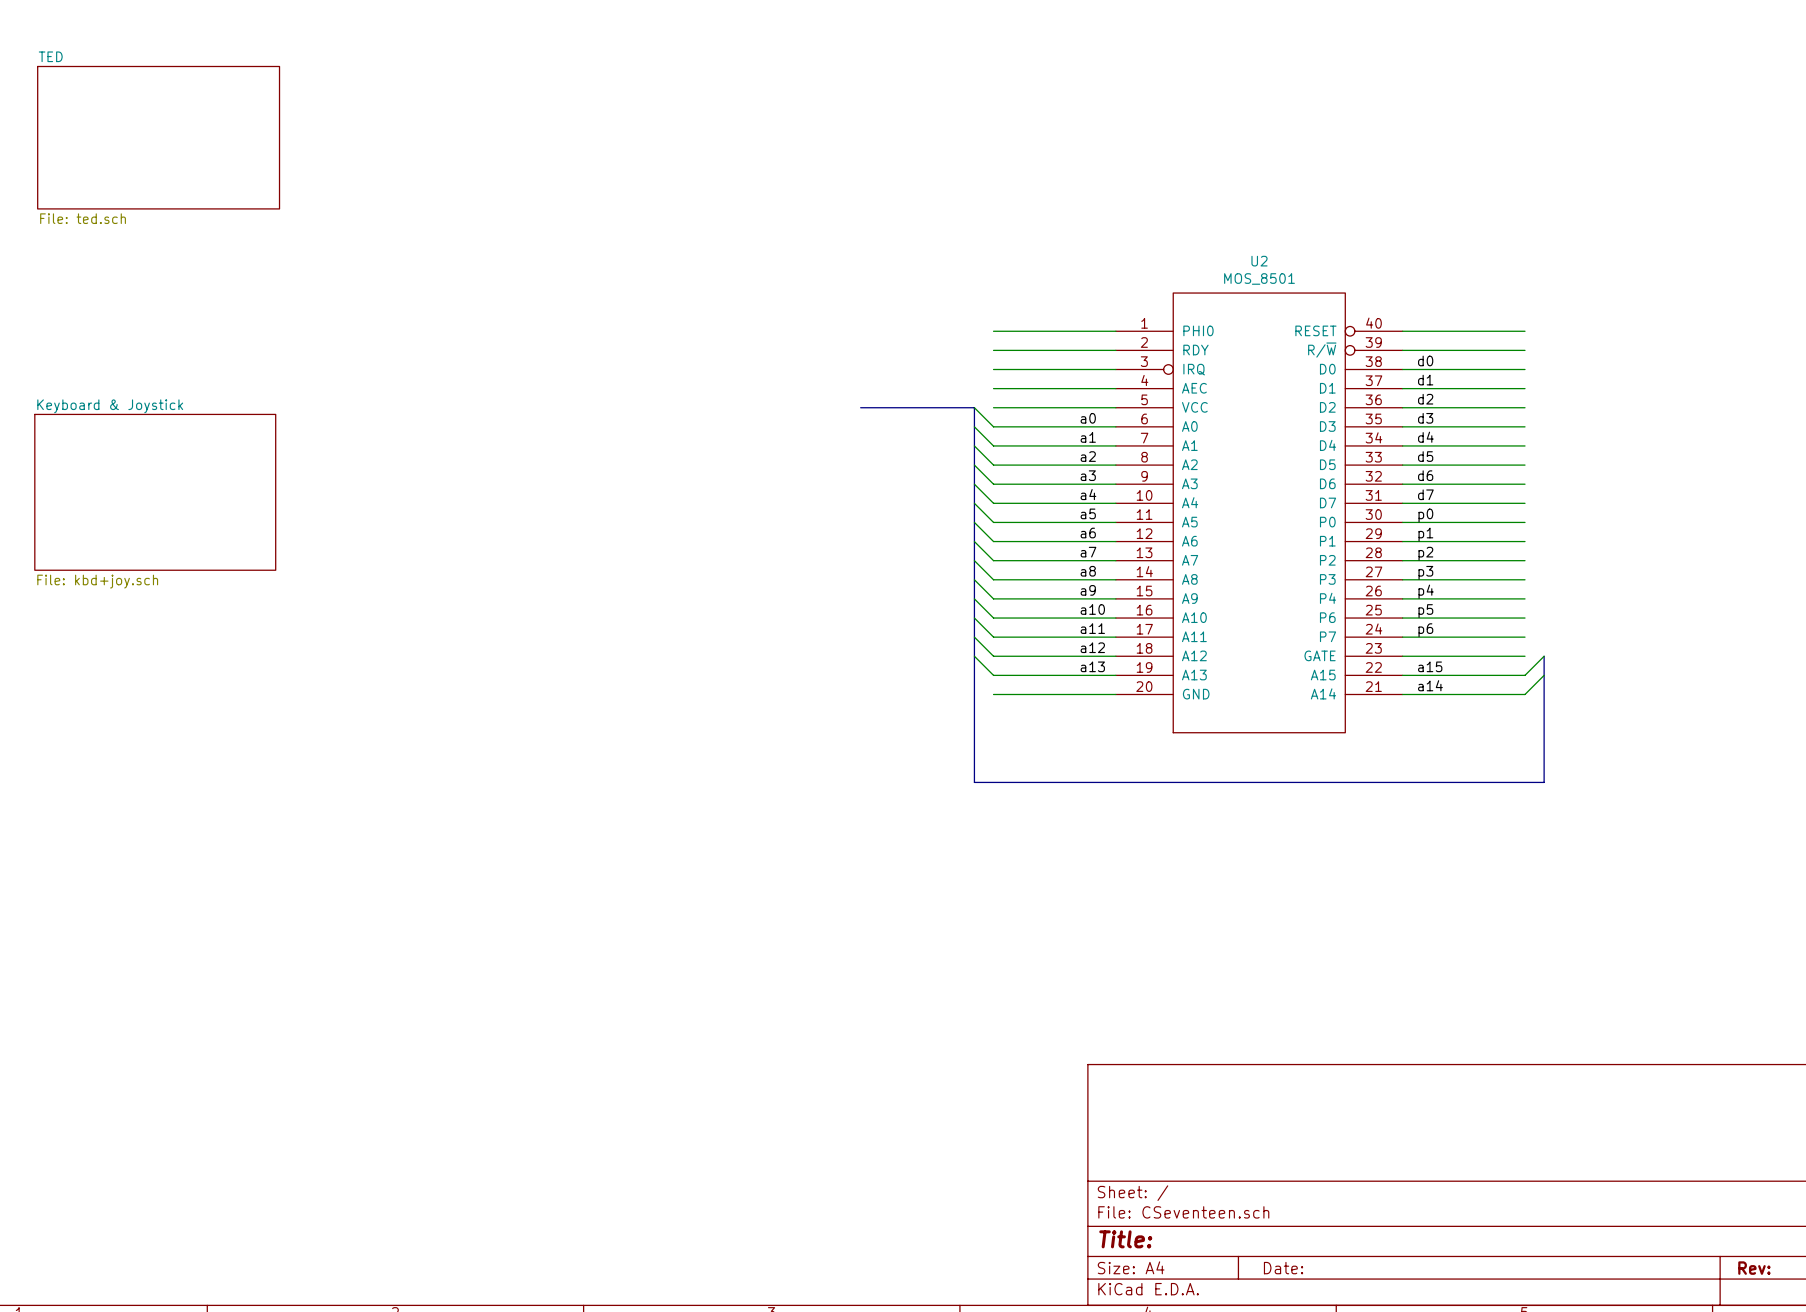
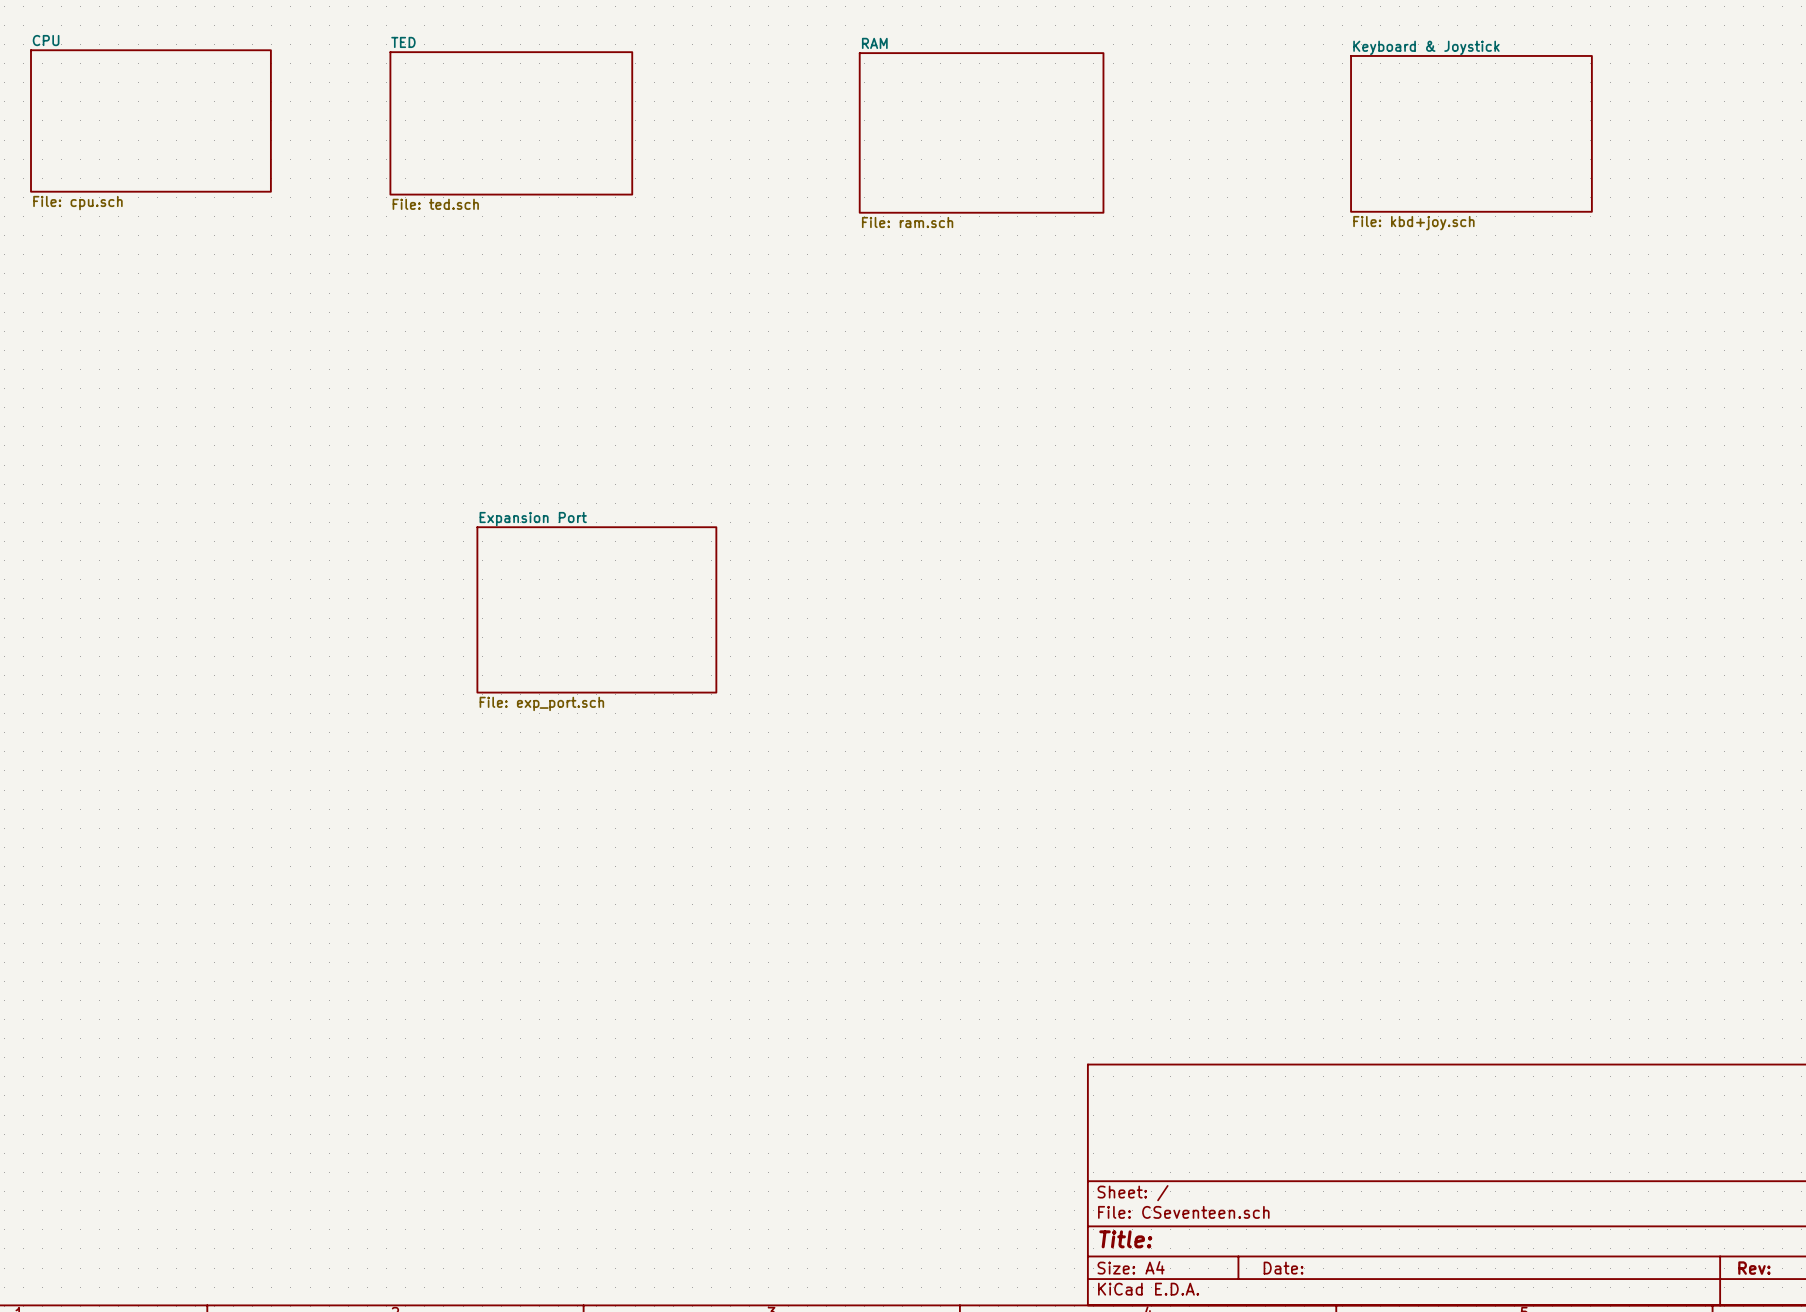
sheet CPU: none -> File: cpu.sch (150, 120)
sheet TED: none -> File: ted.sch (511, 123)
sheet RAM: none -> File: ram.sch (981, 132)
sheet Keyboard & Joystick: none -> File: kbd+joy.sch (1471, 133)
sheet TED: File: ted.sch (158, 137) -> none
wire: (993, 331) (1115, 331) -> none
wire: (1402, 331) (1524, 331) -> none
wire: (993, 350) (1115, 350) -> none
wire: (1402, 350) (1524, 350) -> none
label: d0 (1425, 360) -> none
wire: (993, 369) (1115, 369) -> none
wire: (1402, 369) (1524, 369) -> none
label: d1 (1425, 380) -> none
wire: (993, 388) (1115, 388) -> none
wire: (1402, 388) (1524, 388) -> none
label: d2 (1425, 399) -> none
bus: (860, 407) (974, 407) (974, 782) (1544, 782) (1544, 656) -> none
wire: (974, 407) (993, 426) (1115, 426) -> none
wire: (993, 407) (1115, 407) -> none
wire: (1402, 407) (1524, 407) -> none
label: a0 (1088, 418) -> none
label: d3 (1425, 418) -> none
wire: (974, 426) (993, 445) (1115, 445) -> none
wire: (1402, 426) (1524, 426) -> none
label: a1 (1088, 437) -> none
label: d4 (1425, 437) -> none
wire: (974, 445) (993, 465) (1115, 465) -> none
wire: (1402, 445) (1524, 445) -> none
label: a2 (1088, 456) -> none
label: d5 (1425, 456) -> none
wire: (974, 465) (993, 484) (1115, 484) -> none
wire: (1402, 465) (1524, 465) -> none
label: a3 (1088, 475) -> none
label: d6 (1425, 475) -> none
wire: (974, 484) (993, 503) (1115, 503) -> none
wire: (1402, 484) (1524, 484) -> none
sheet Keyboard & Joystick: File: kbd+joy.sch (155, 492) -> none
label: a4 (1088, 494) -> none
label: d7 (1425, 494) -> none
wire: (974, 503) (993, 522) (1115, 522) -> none
wire: (1402, 503) (1524, 503) -> none
U2: MOS_8501 (1259, 512) -> none
label: a5 (1088, 513) -> none
label: p0 (1425, 515) -> none
wire: (974, 522) (993, 541) (1115, 541) -> none
wire: (1402, 522) (1524, 522) -> none
label: a6 (1088, 533) -> none
label: p1 (1425, 534) -> none
wire: (974, 541) (993, 560) (1115, 560) -> none
wire: (1402, 541) (1524, 541) -> none
label: a7 (1088, 552) -> none
label: p2 (1425, 553) -> none
wire: (974, 560) (993, 579) (1115, 579) -> none
wire: (1402, 560) (1524, 560) -> none
label: a8 (1088, 571) -> none
label: p3 (1425, 572) -> none
wire: (974, 579) (993, 598) (1115, 598) -> none
wire: (1402, 579) (1524, 579) -> none
label: a9 (1088, 590) -> none
label: p4 (1426, 591) -> none
wire: (974, 598) (993, 618) (1115, 618) -> none
wire: (1402, 598) (1524, 598) -> none
sheet Expansion Port: none -> File: exp_port.sch (596, 609)
label: a10 (1092, 609) -> none
label: p5 (1425, 611) -> none
wire: (974, 618) (993, 637) (1115, 637) -> none
wire: (1402, 618) (1524, 618) -> none
label: a11 (1092, 628) -> none
label: p6 (1425, 630) -> none
wire: (974, 637) (993, 656) (1115, 656) -> none
wire: (1402, 637) (1524, 637) -> none
label: a12 (1092, 647) -> none
wire: (974, 656) (993, 675) (1115, 675) -> none
wire: (1402, 656) (1524, 656) -> none
wire: (1544, 656) (1524, 675) (1402, 675) -> none
label: a13 (1092, 666) -> none
label: a15 (1430, 666) -> none
wire: (1544, 675) (1524, 694) (1402, 694) -> none
label: a14 (1430, 685) -> none
wire: (993, 694) (1115, 694) -> none

